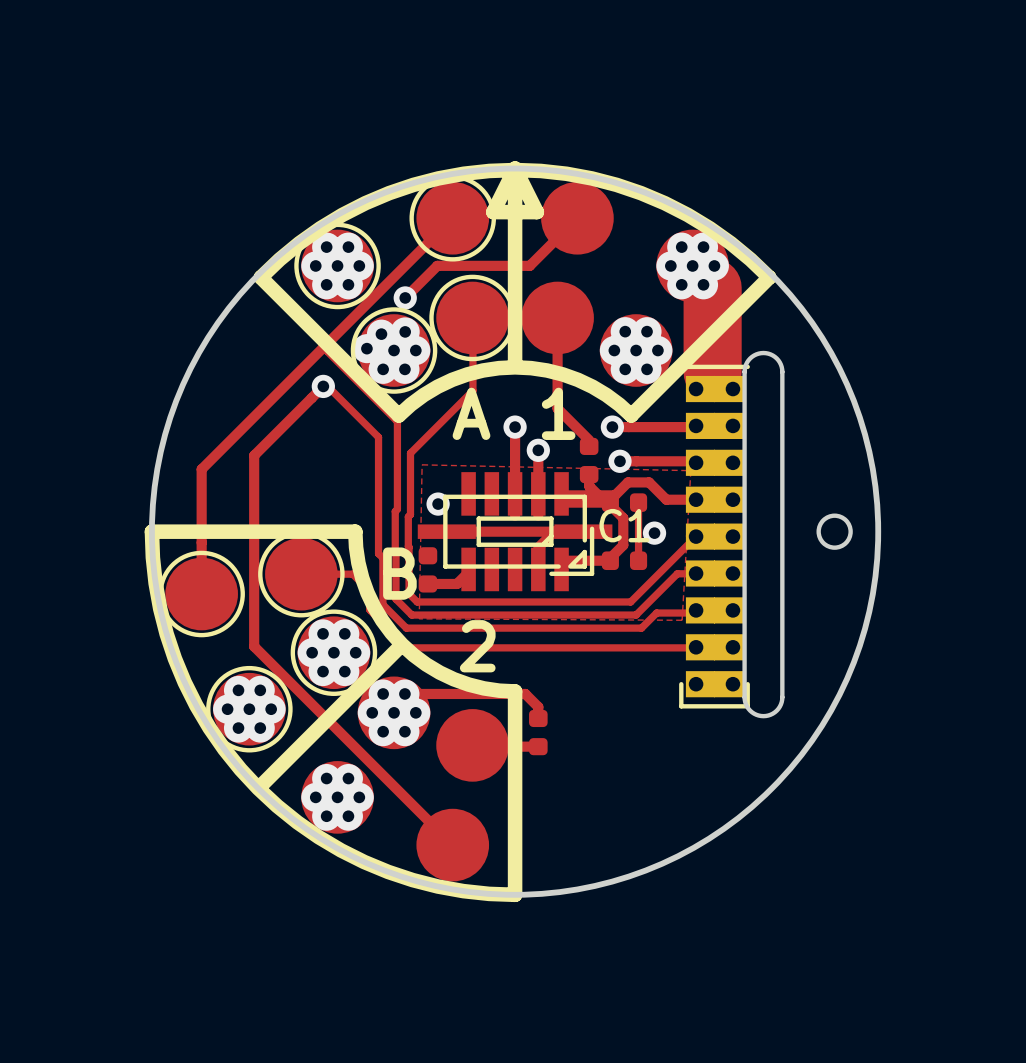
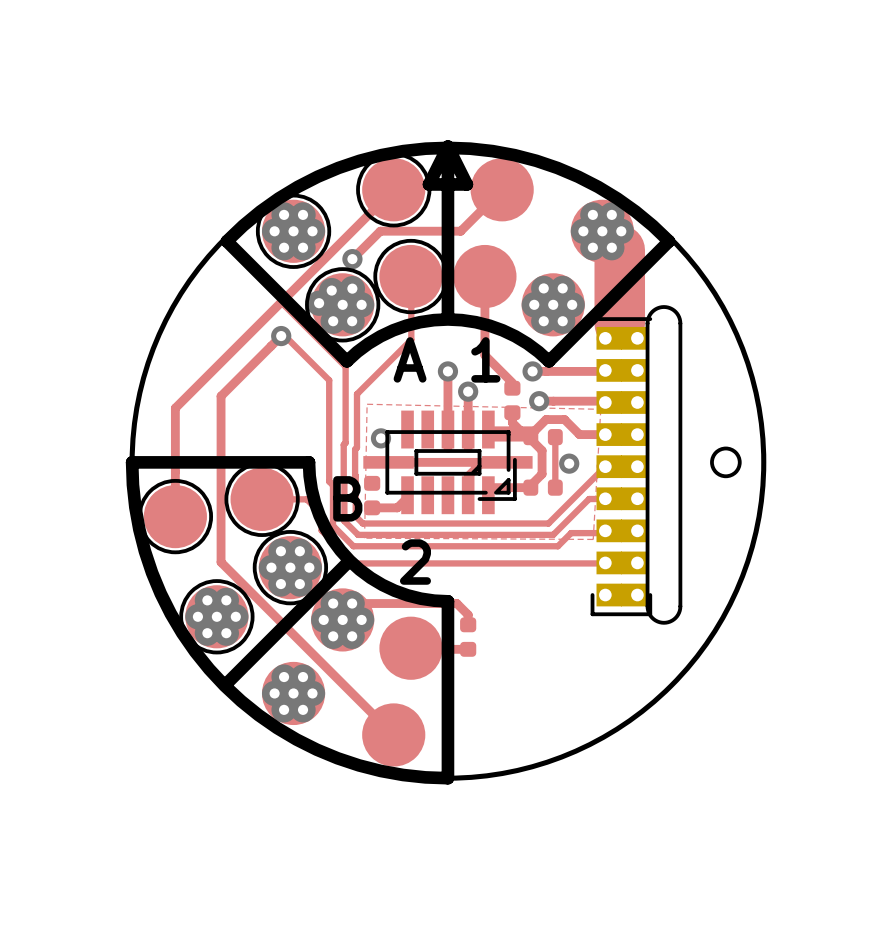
C1 name: C1 (624, 525) -> none

